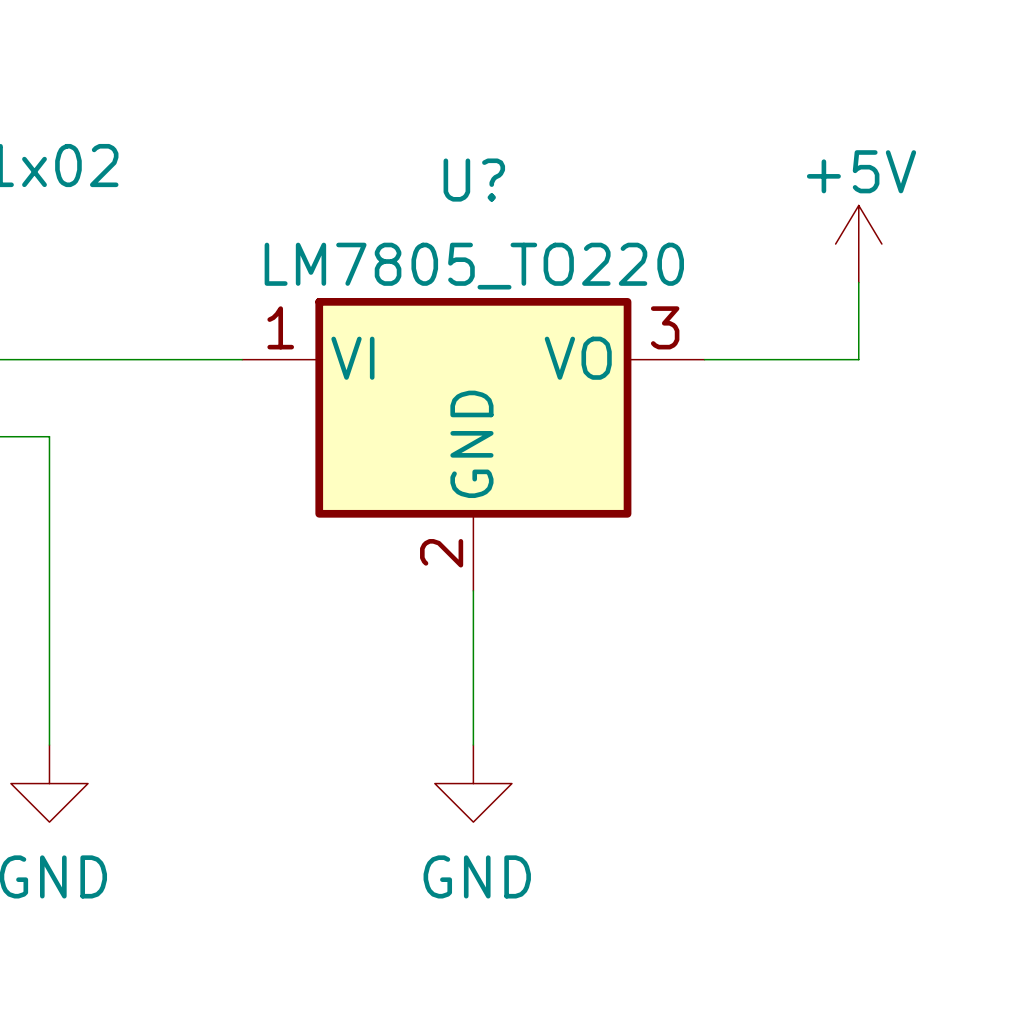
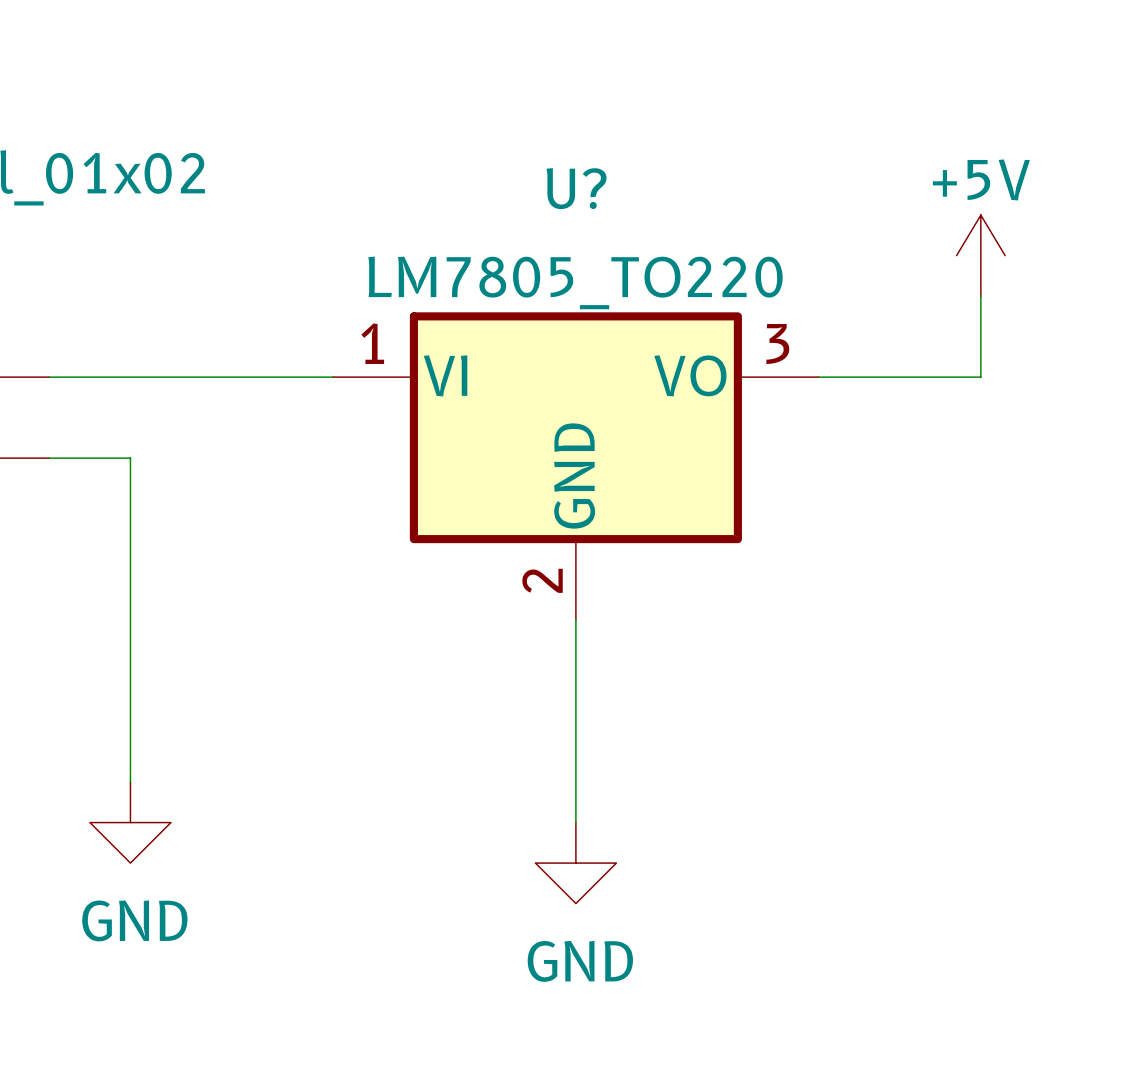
power symbol position: GND (473, 783) -> GND (575, 863)

